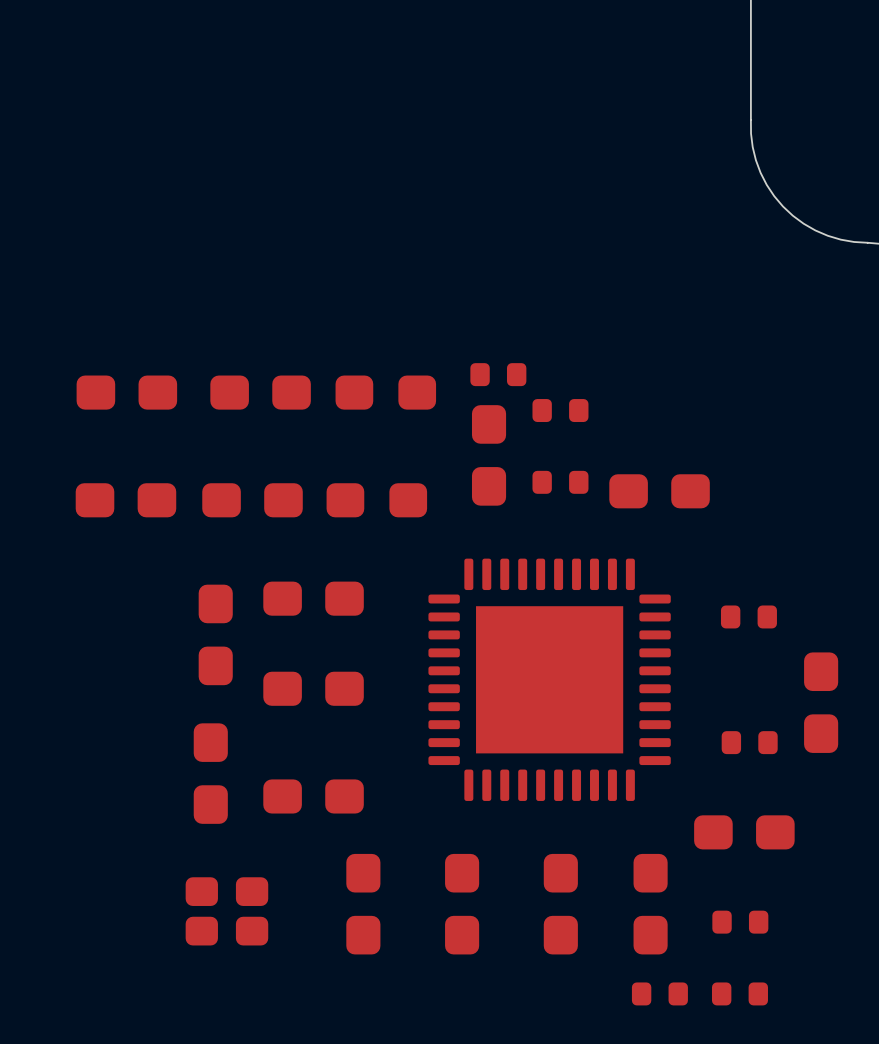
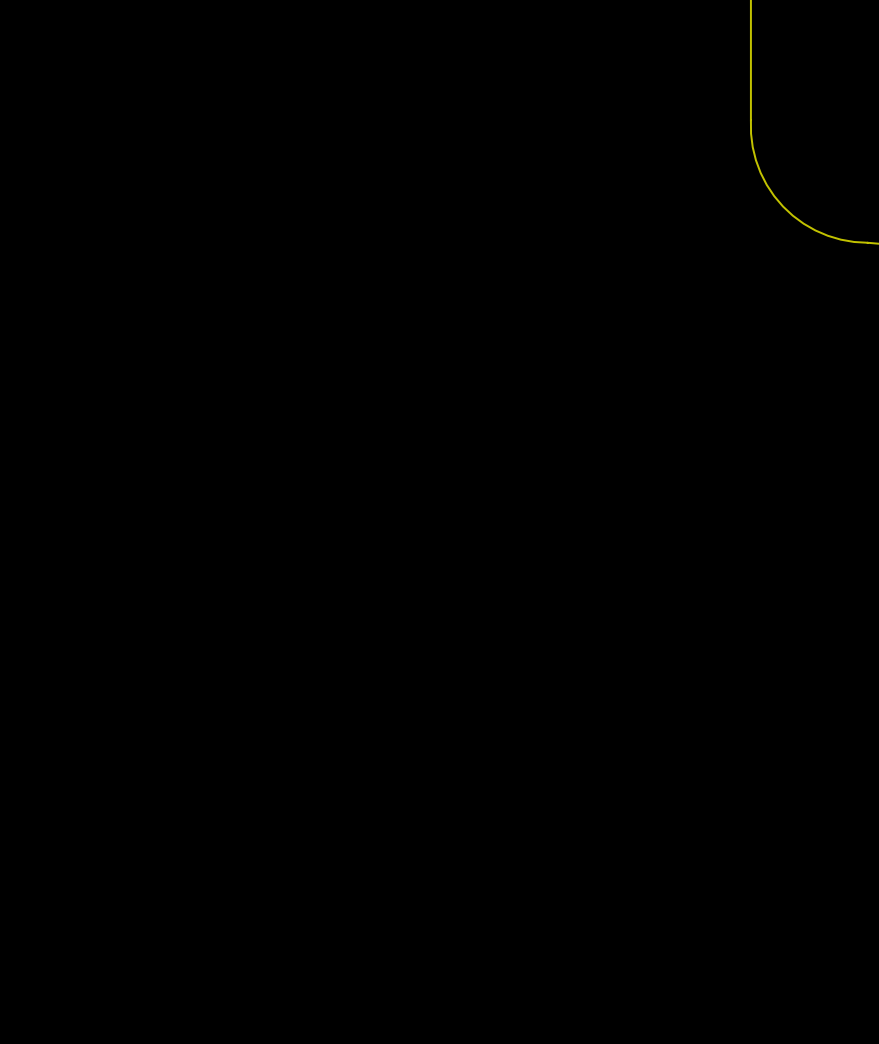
part: (498, 374) -> none
part: (126, 392) -> none
part: (260, 392) -> none
part: (385, 392) -> none
part: (560, 410) -> none
part: (489, 455) -> none
part: (560, 482) -> none
part: (659, 491) -> none
part: (125, 500) -> none
part: (252, 500) -> none
part: (376, 500) -> none
part: (313, 598) -> none
part: (748, 616) -> none
part: (215, 634) -> none
part: (549, 679) -> none
part: (313, 688) -> none
part: (821, 702) -> none
part: (749, 742) -> none
part: (210, 773) -> none
part: (313, 796) -> none
part: (744, 832) -> none
part: (363, 904) -> none
part: (462, 904) -> none
part: (560, 904) -> none
part: (650, 904) -> none
part: (226, 911) -> none
part: (740, 922) -> none
part: (659, 993) -> none
part: (739, 993) -> none

